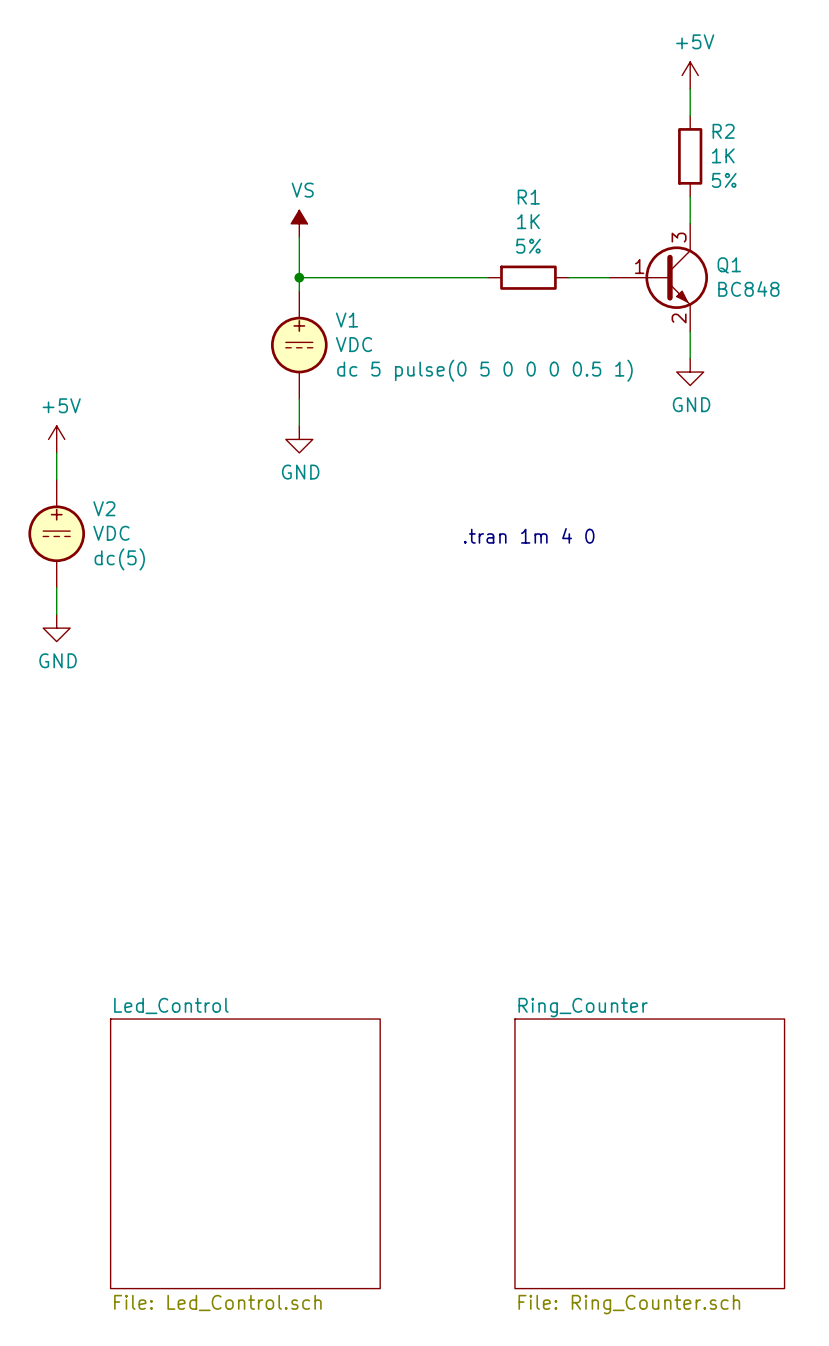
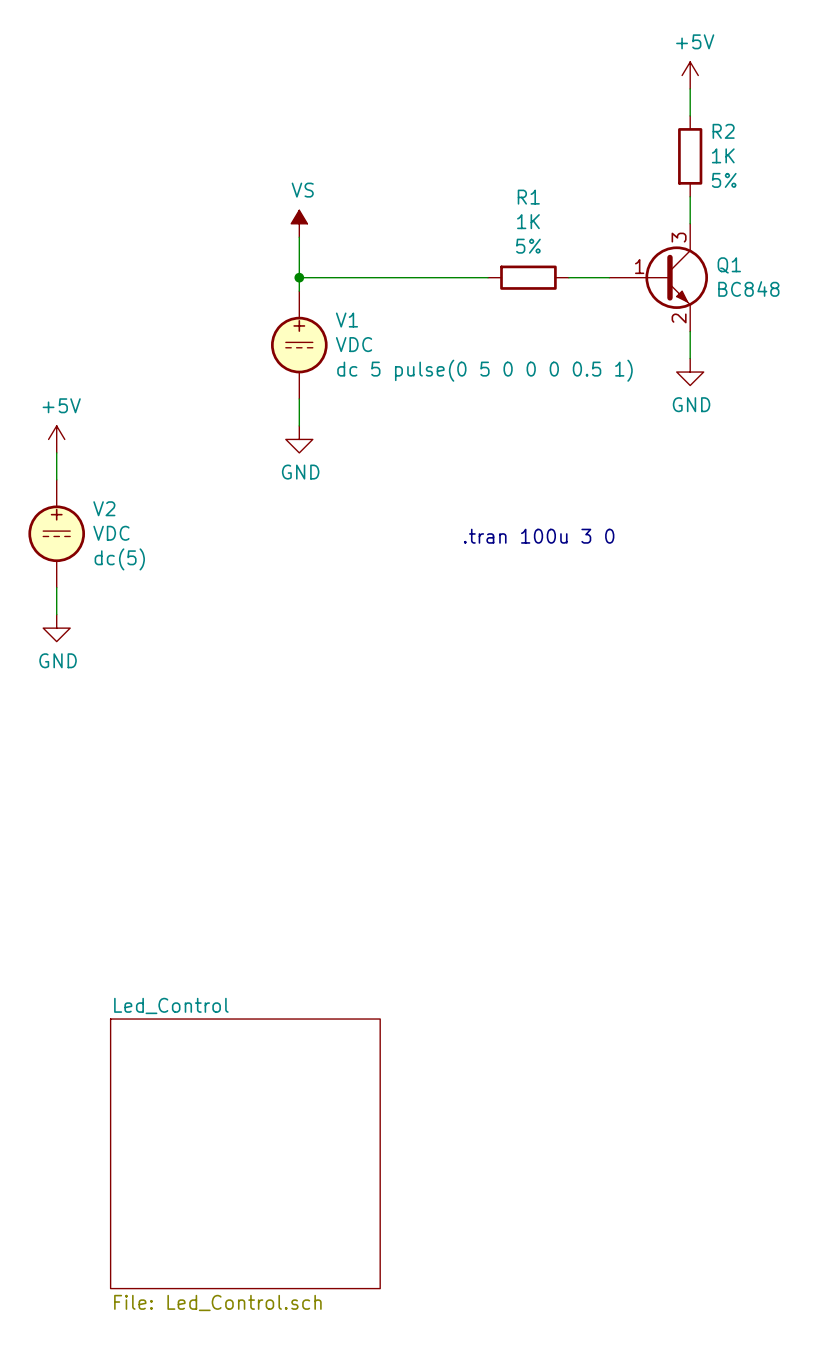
text: .tran 1m 4 0 (529, 535) -> .tran 100u 3 0 (539, 536)
sheet Ring_Counter: File: Ring_Counter.sch (649, 1153) -> none

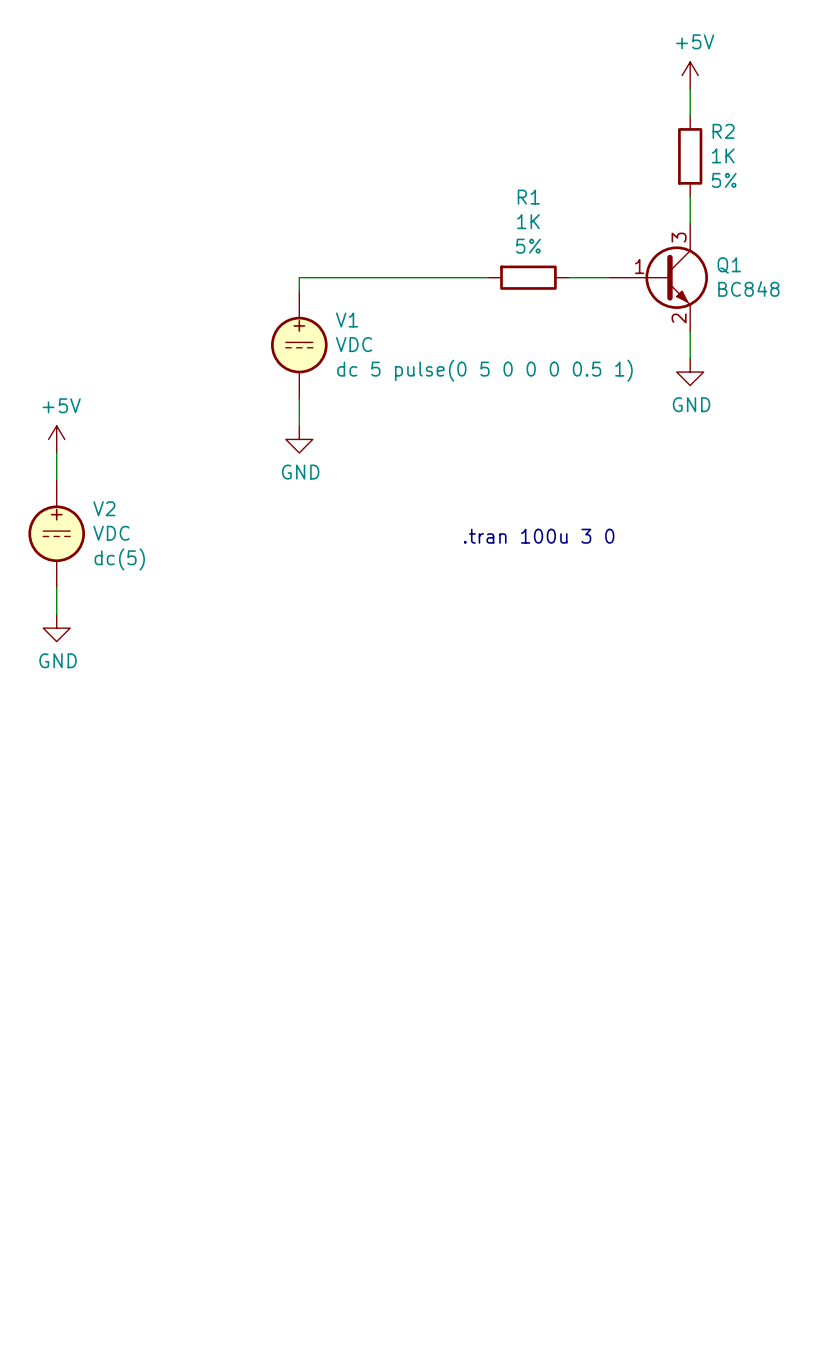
power symbol: VS (299, 223) -> none
wire: (299, 237) (299, 277) -> none
junction: (299, 277) -> none
sheet Led_Control: File: Led_Control.sch (245, 1153) -> none

